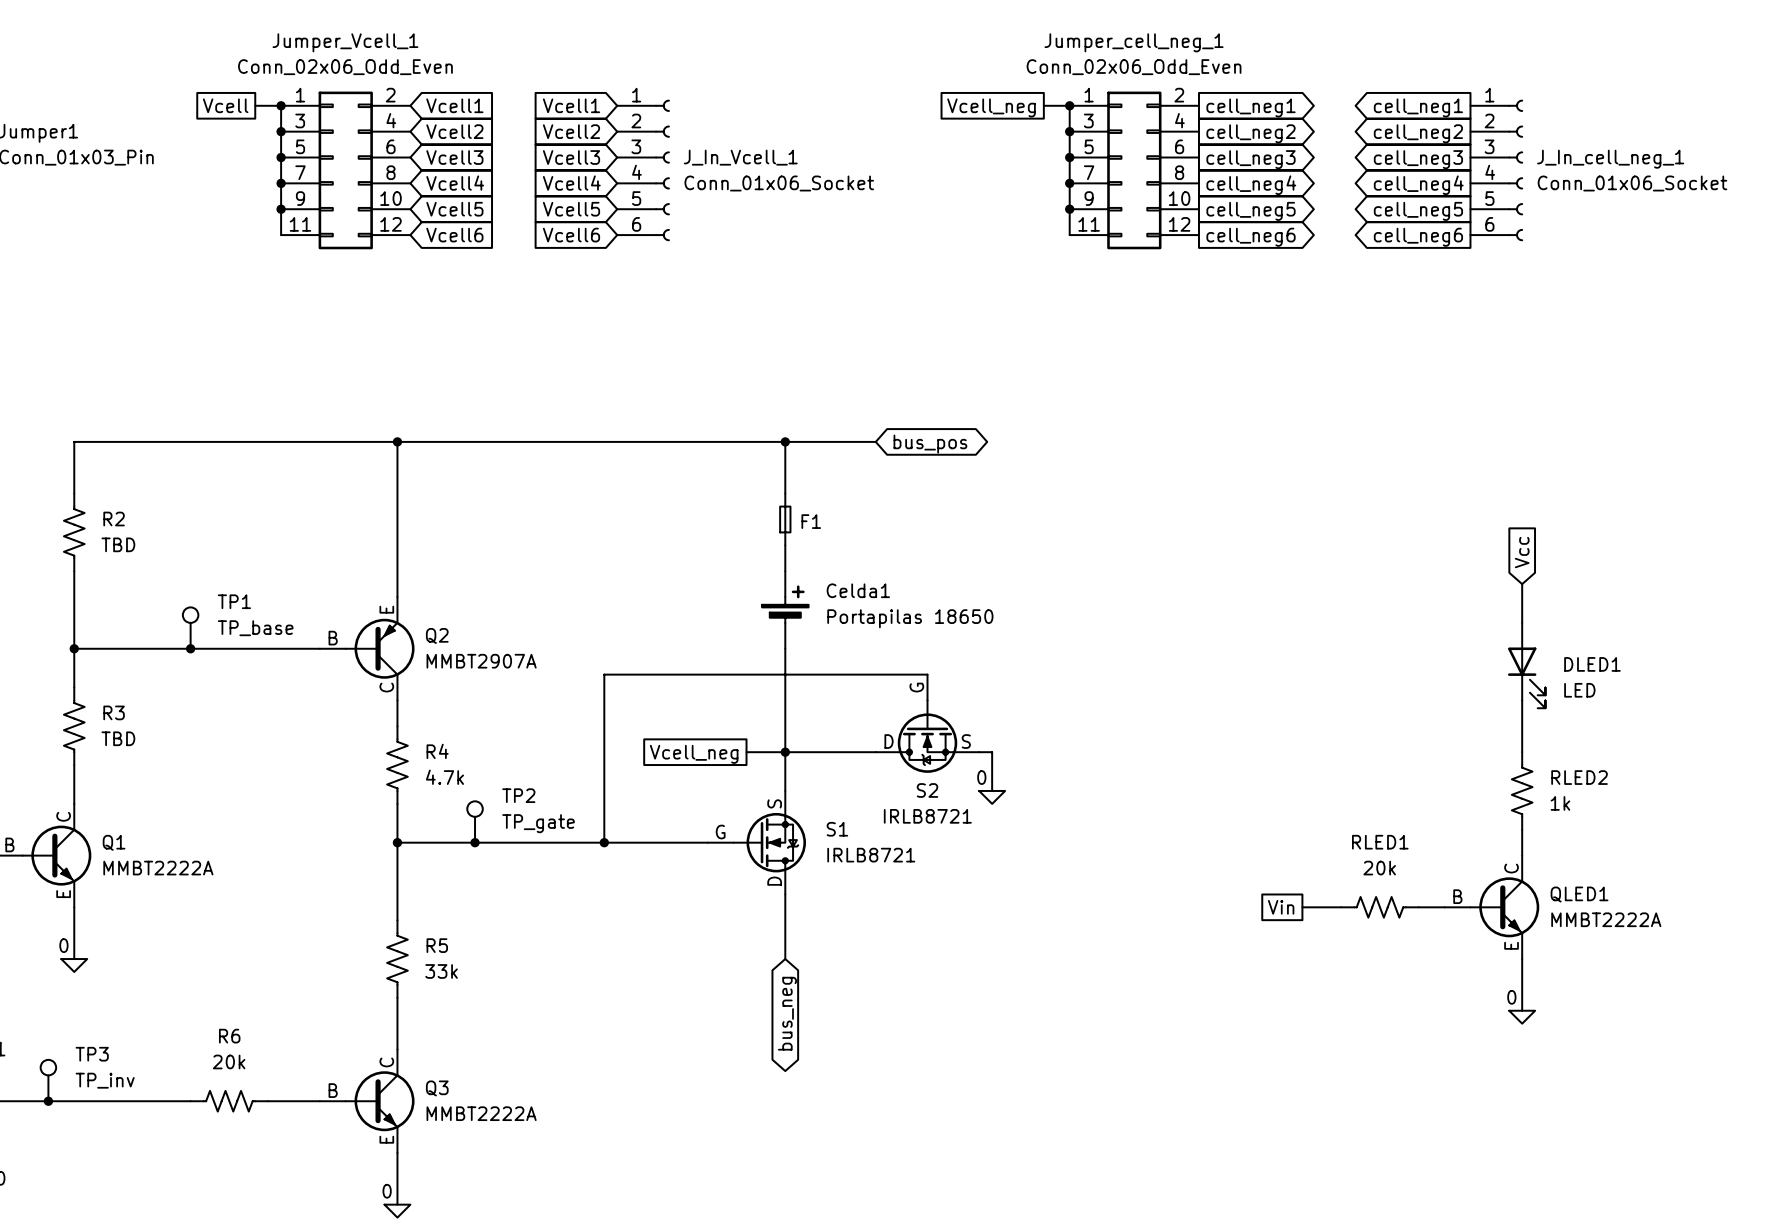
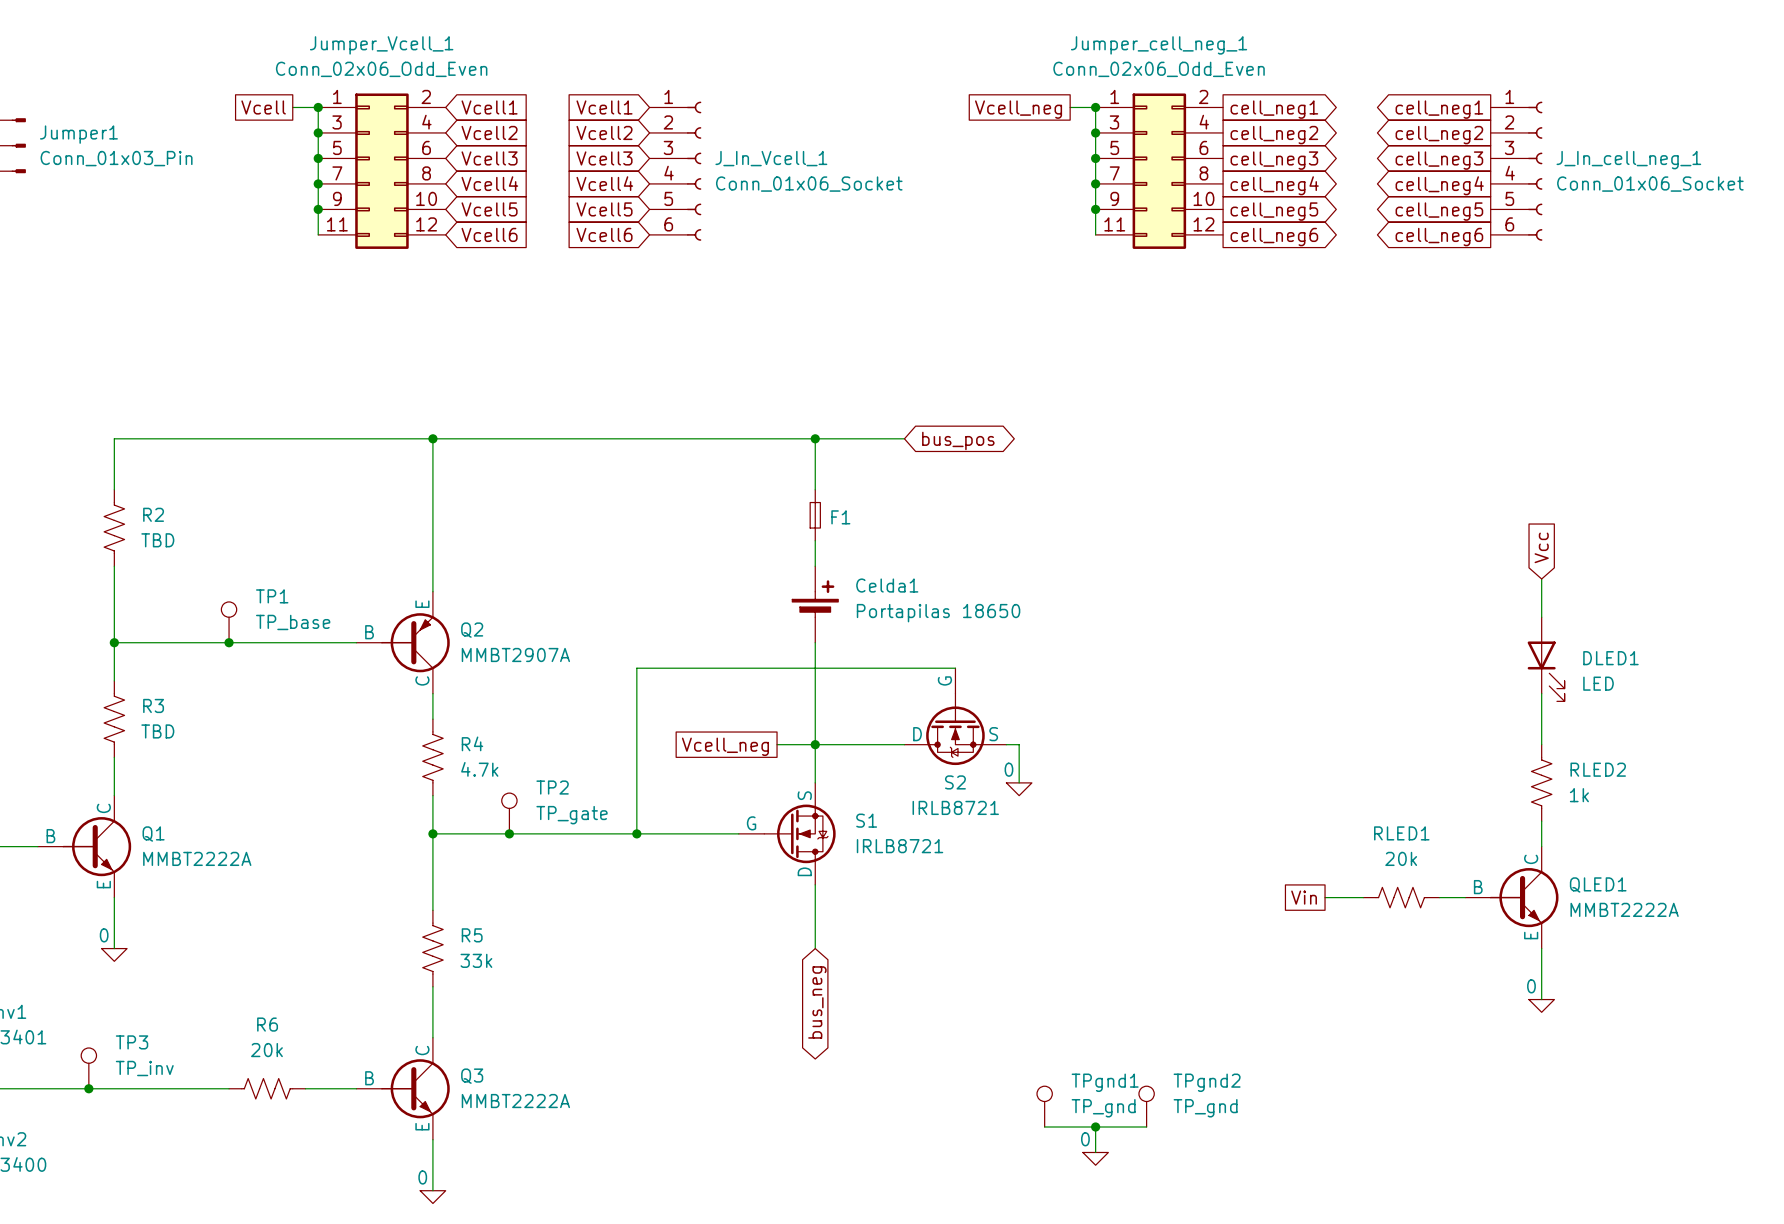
TPgnd1: none -> TP_gnd (1044, 1106)
TPgnd2: none -> TP_gnd (1146, 1106)
wire: none -> (1044, 1127) (1146, 1127)
wire: none -> (1095, 1127) (1095, 1152)
junction: none -> (1095, 1127)
power symbol: none -> 0 (1095, 1158)

